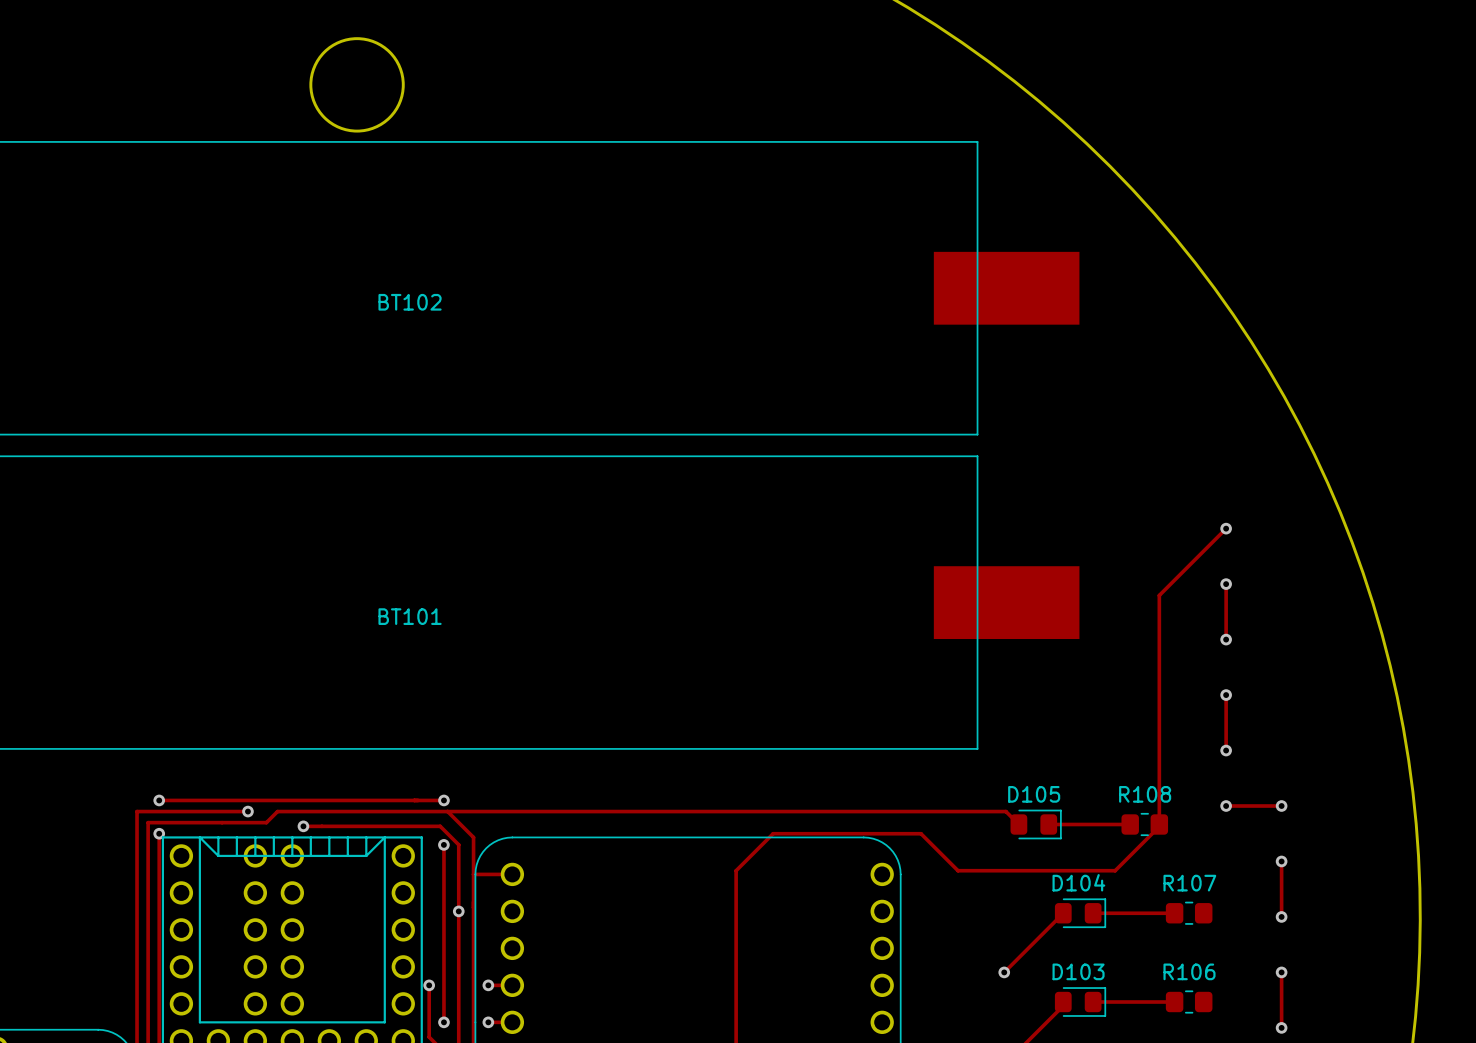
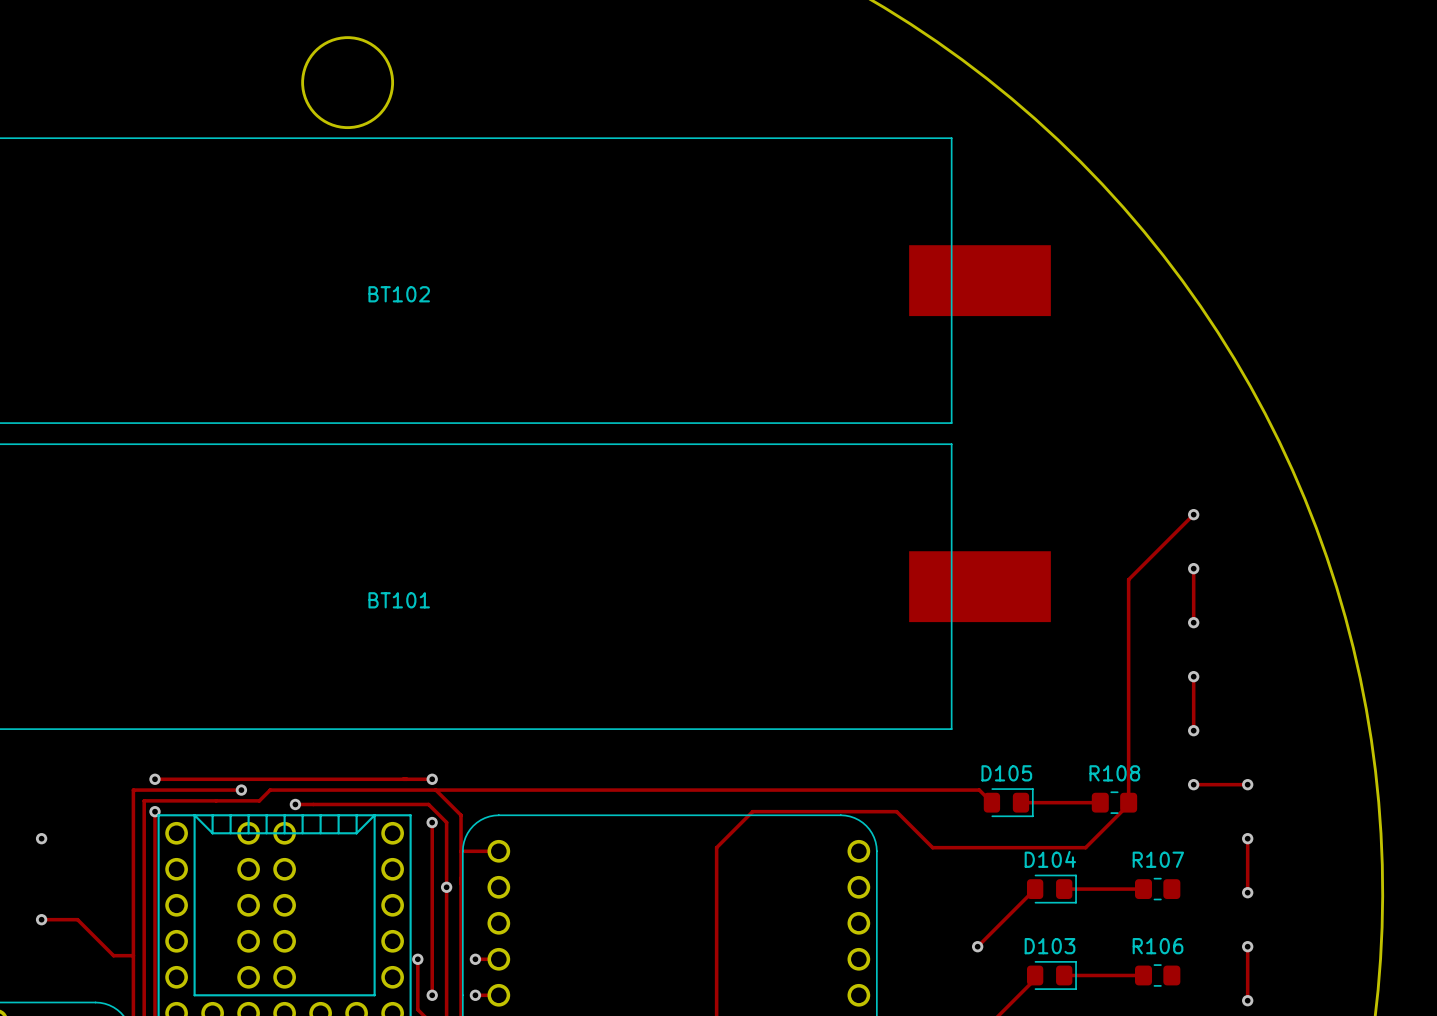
via: none -> (41, 838)
track: none -> (41, 919) (77, 919) (113, 955) (133, 955)
via: none -> (41, 919)

